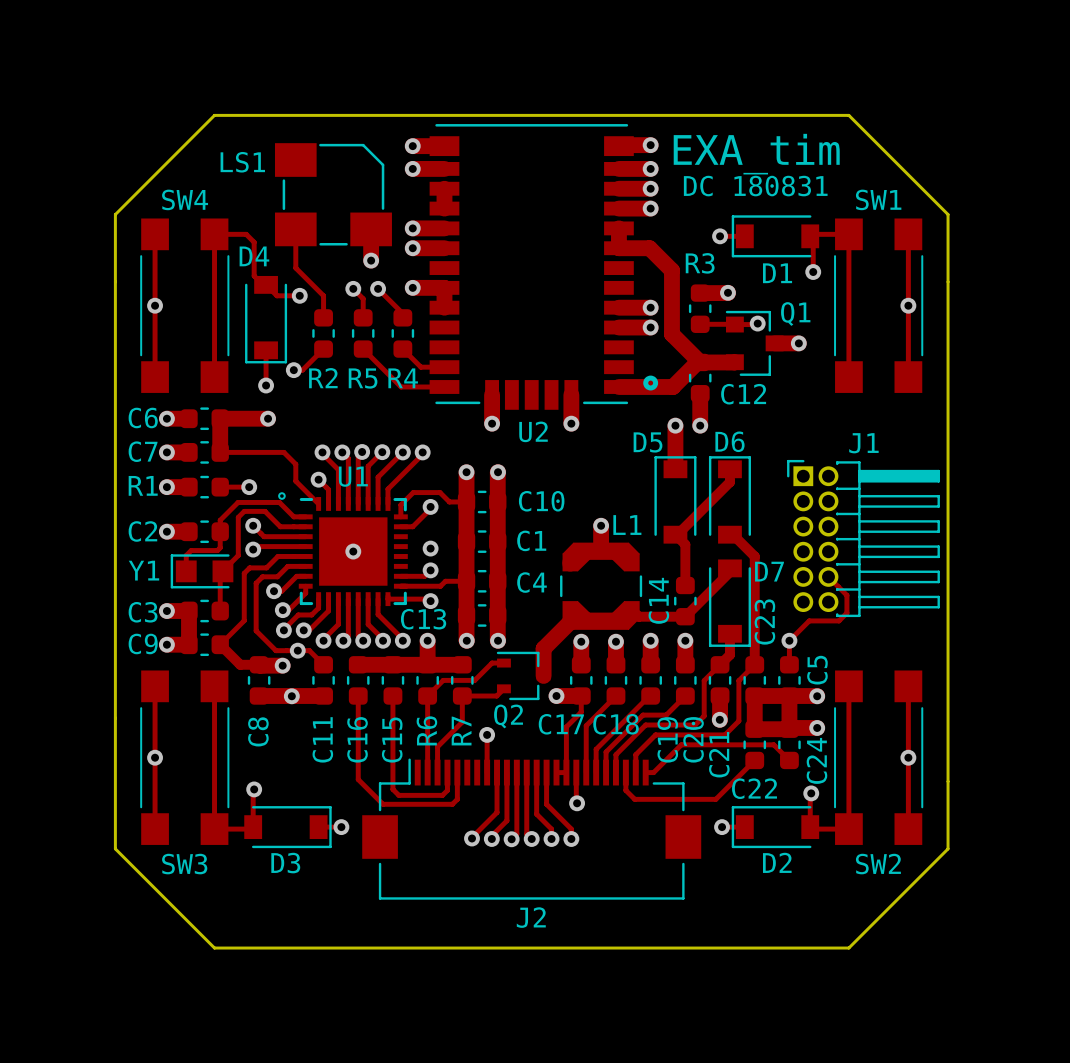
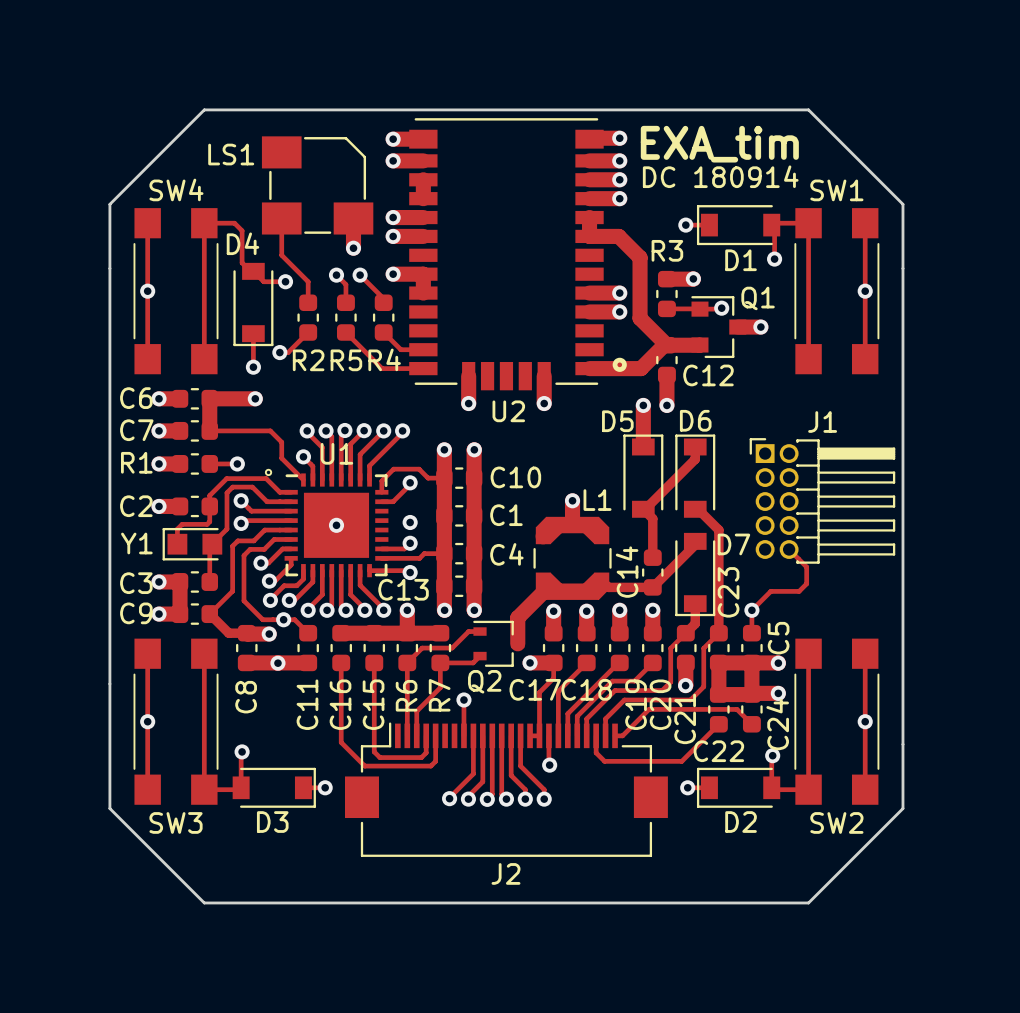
text: DC 180831 (755, 186) -> DC 180914 (720, 176)
J1 footprint: [787, 459, 940, 618] -> [749, 438, 896, 564]

